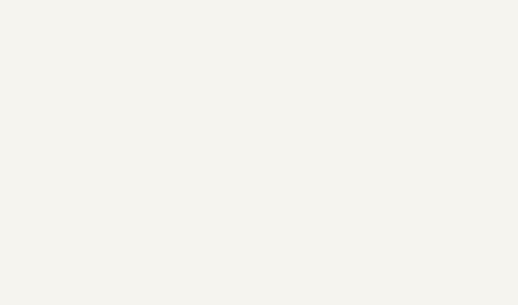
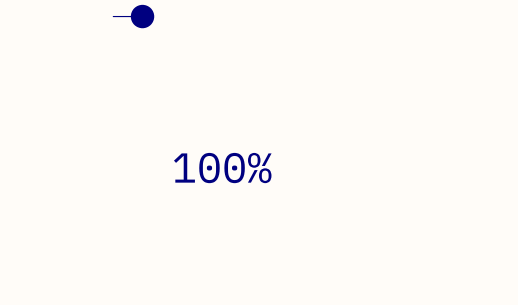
wire: none -> (113, 16) (142, 16)
junction: none -> (142, 16)
text: none -> 100% (222, 168)

